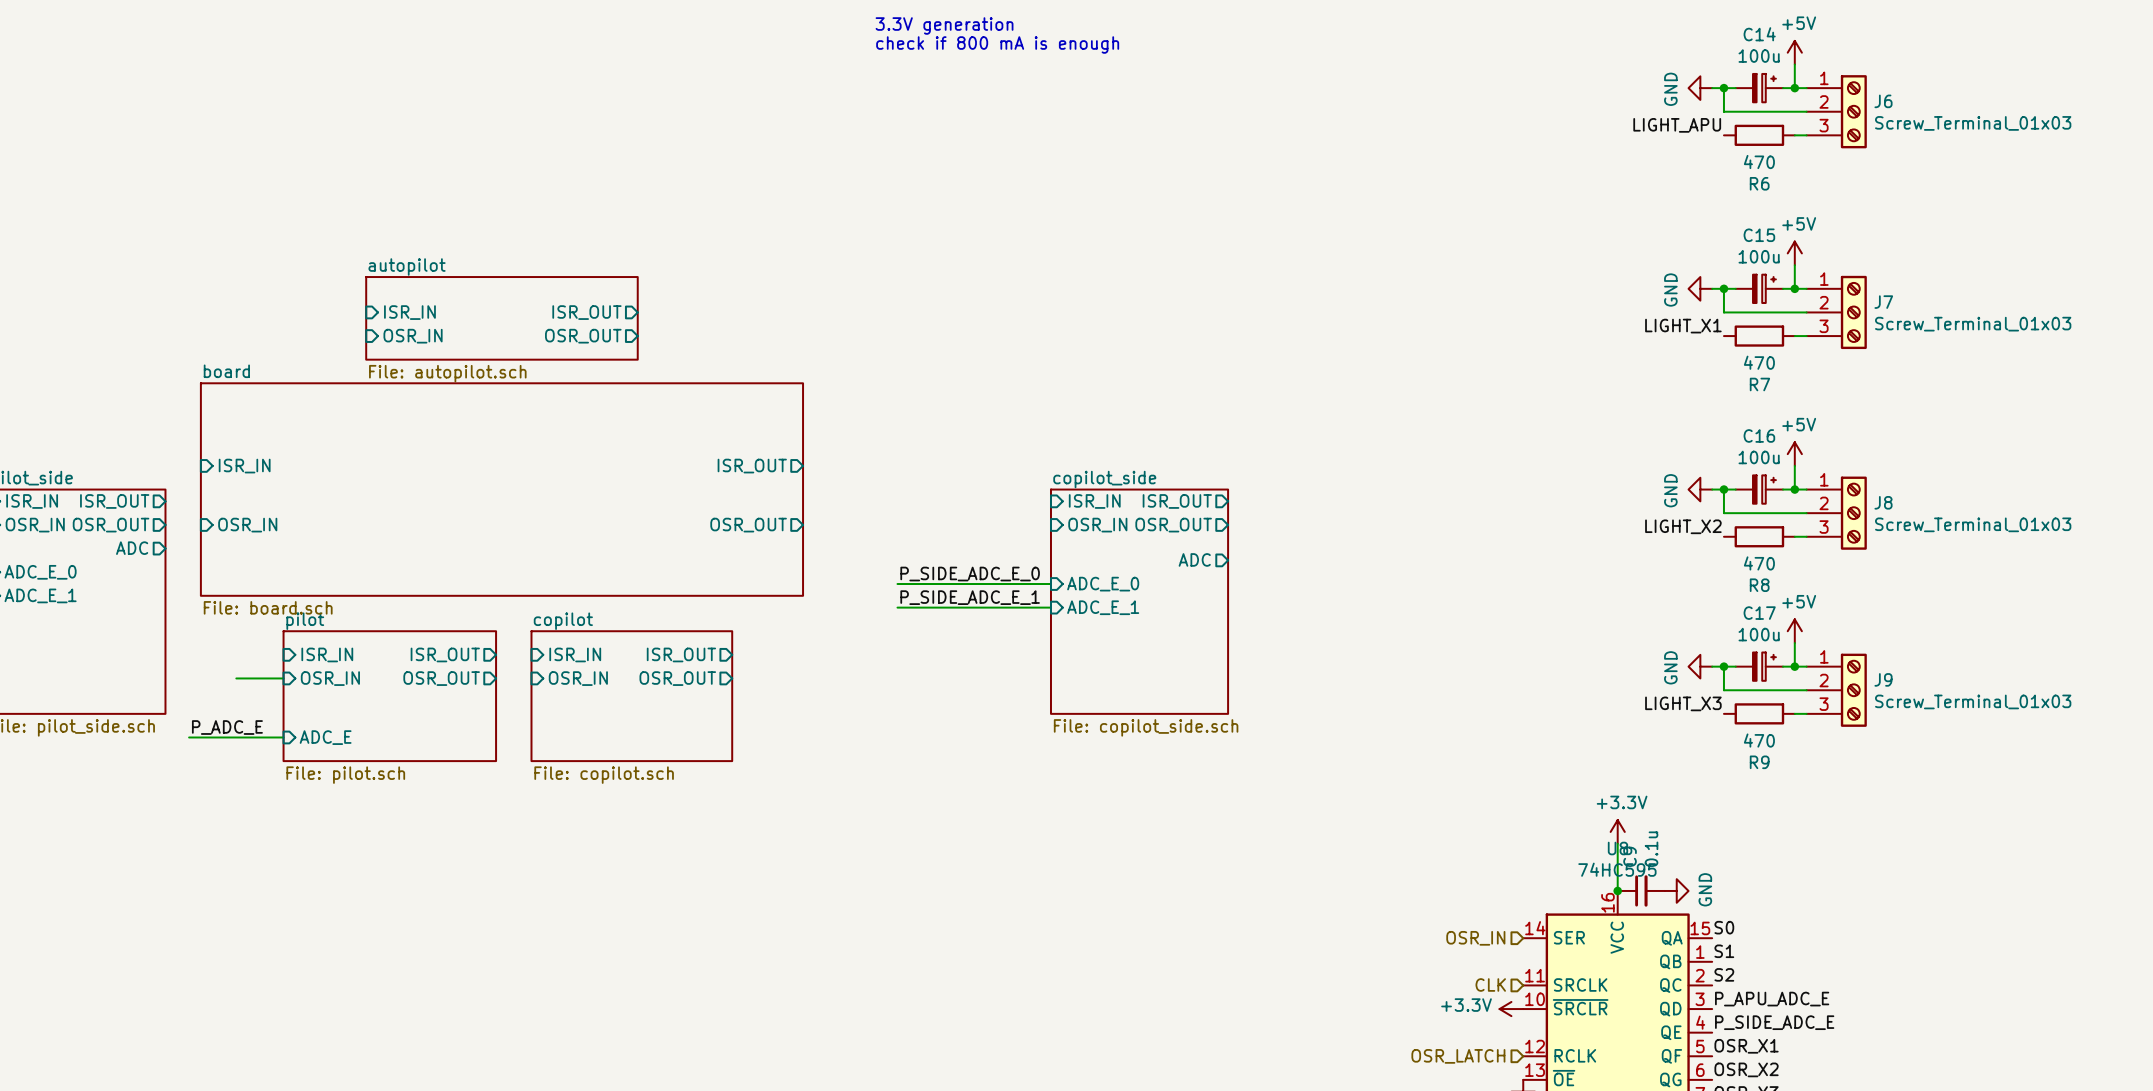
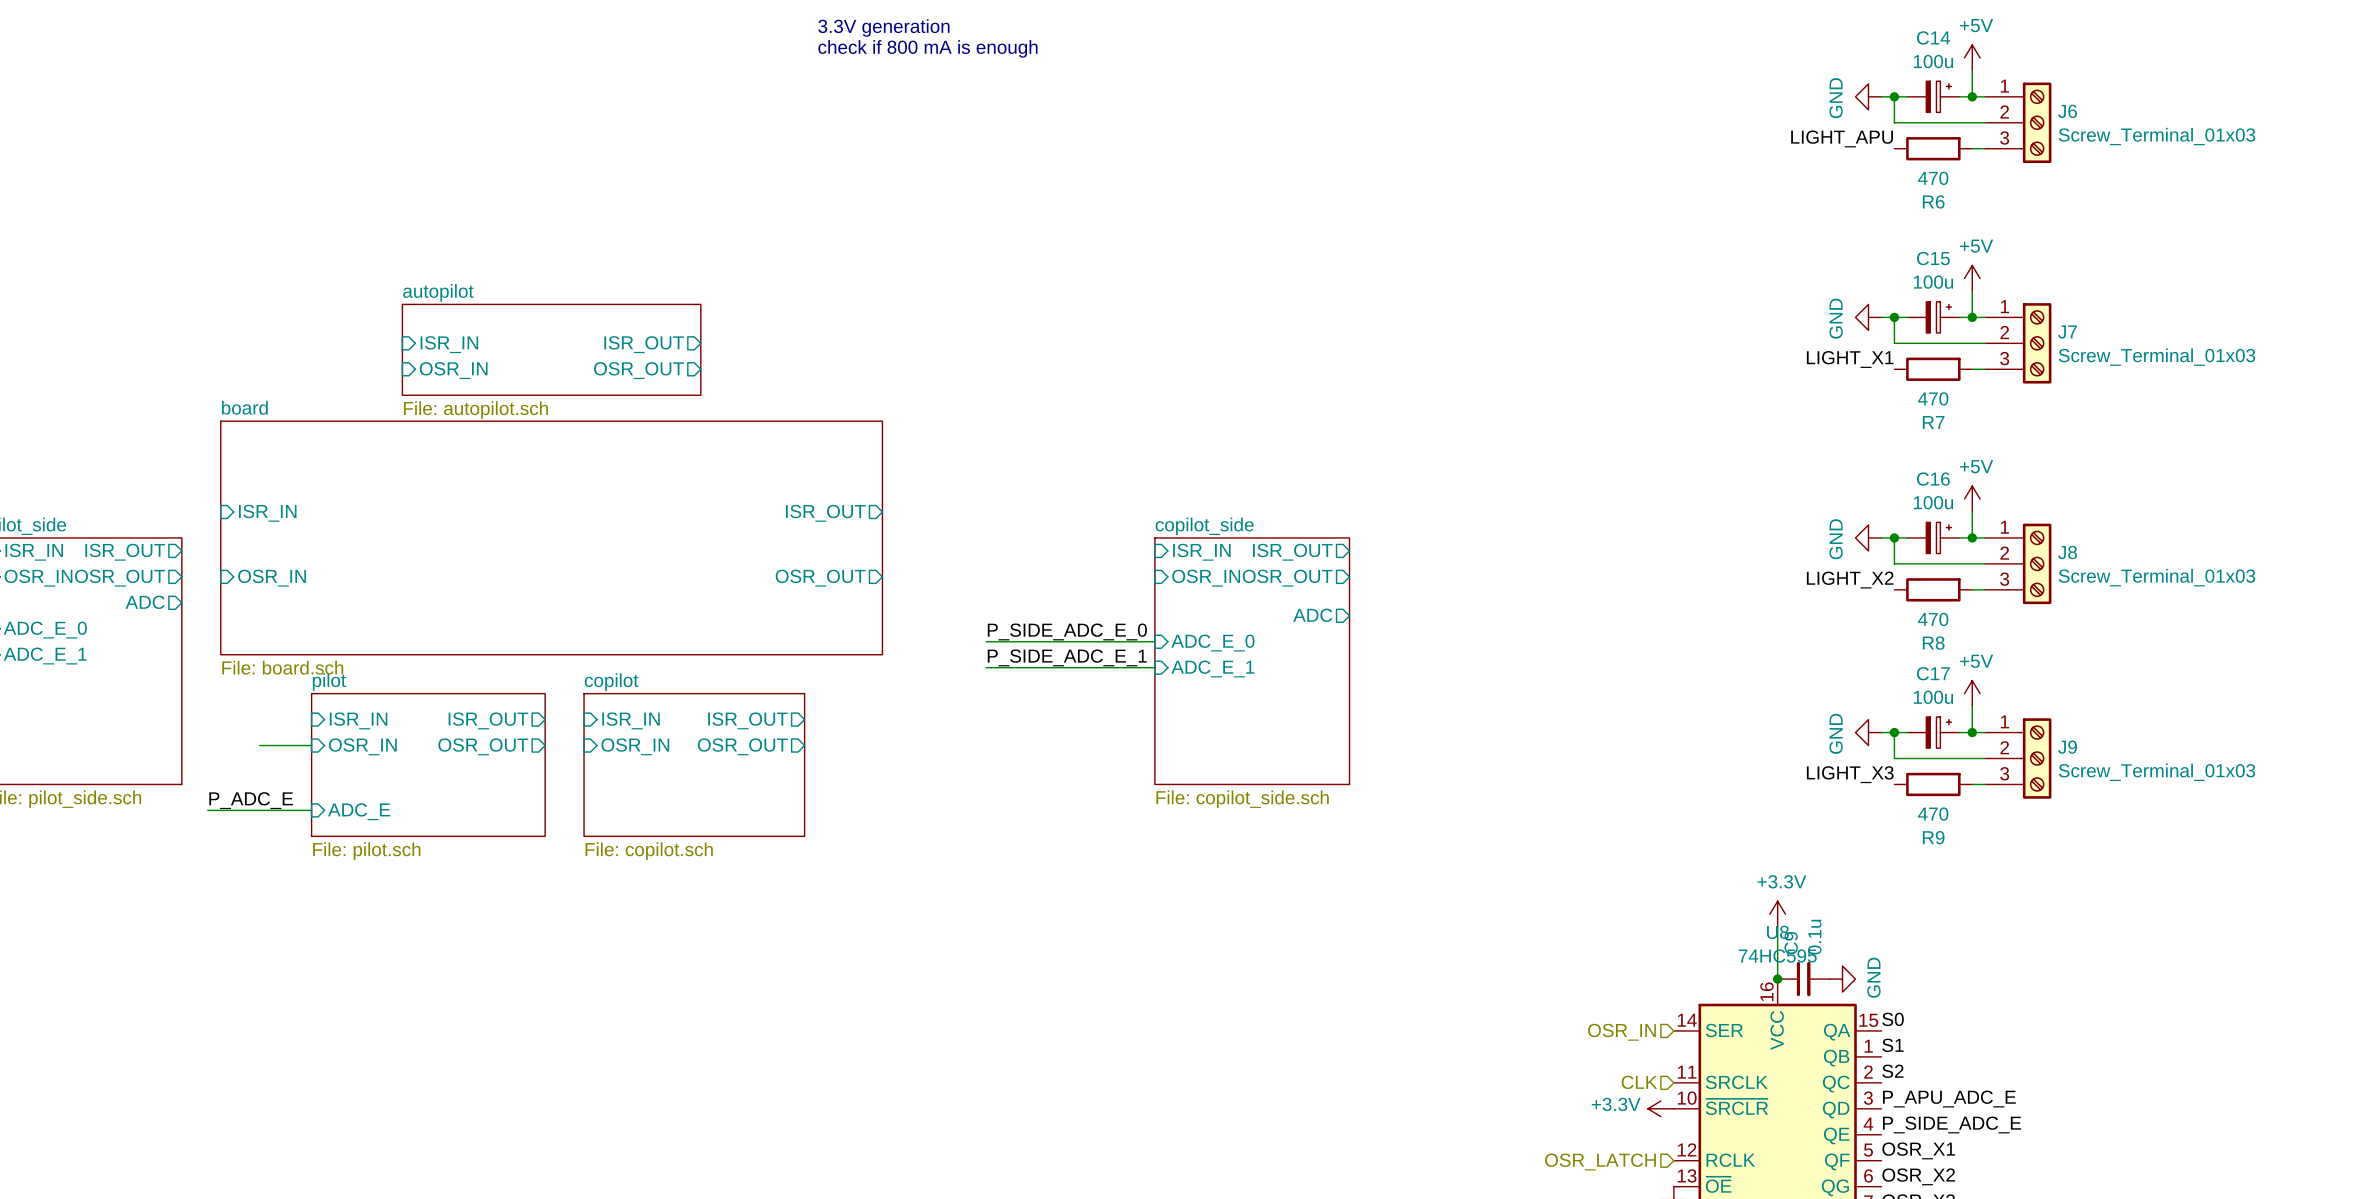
text position: 3.3V generation (944, 25) -> 3.3V generation (883, 28)
text position: check if 800 mA is enough (997, 44) -> check if 800 mA is enough (927, 48)

